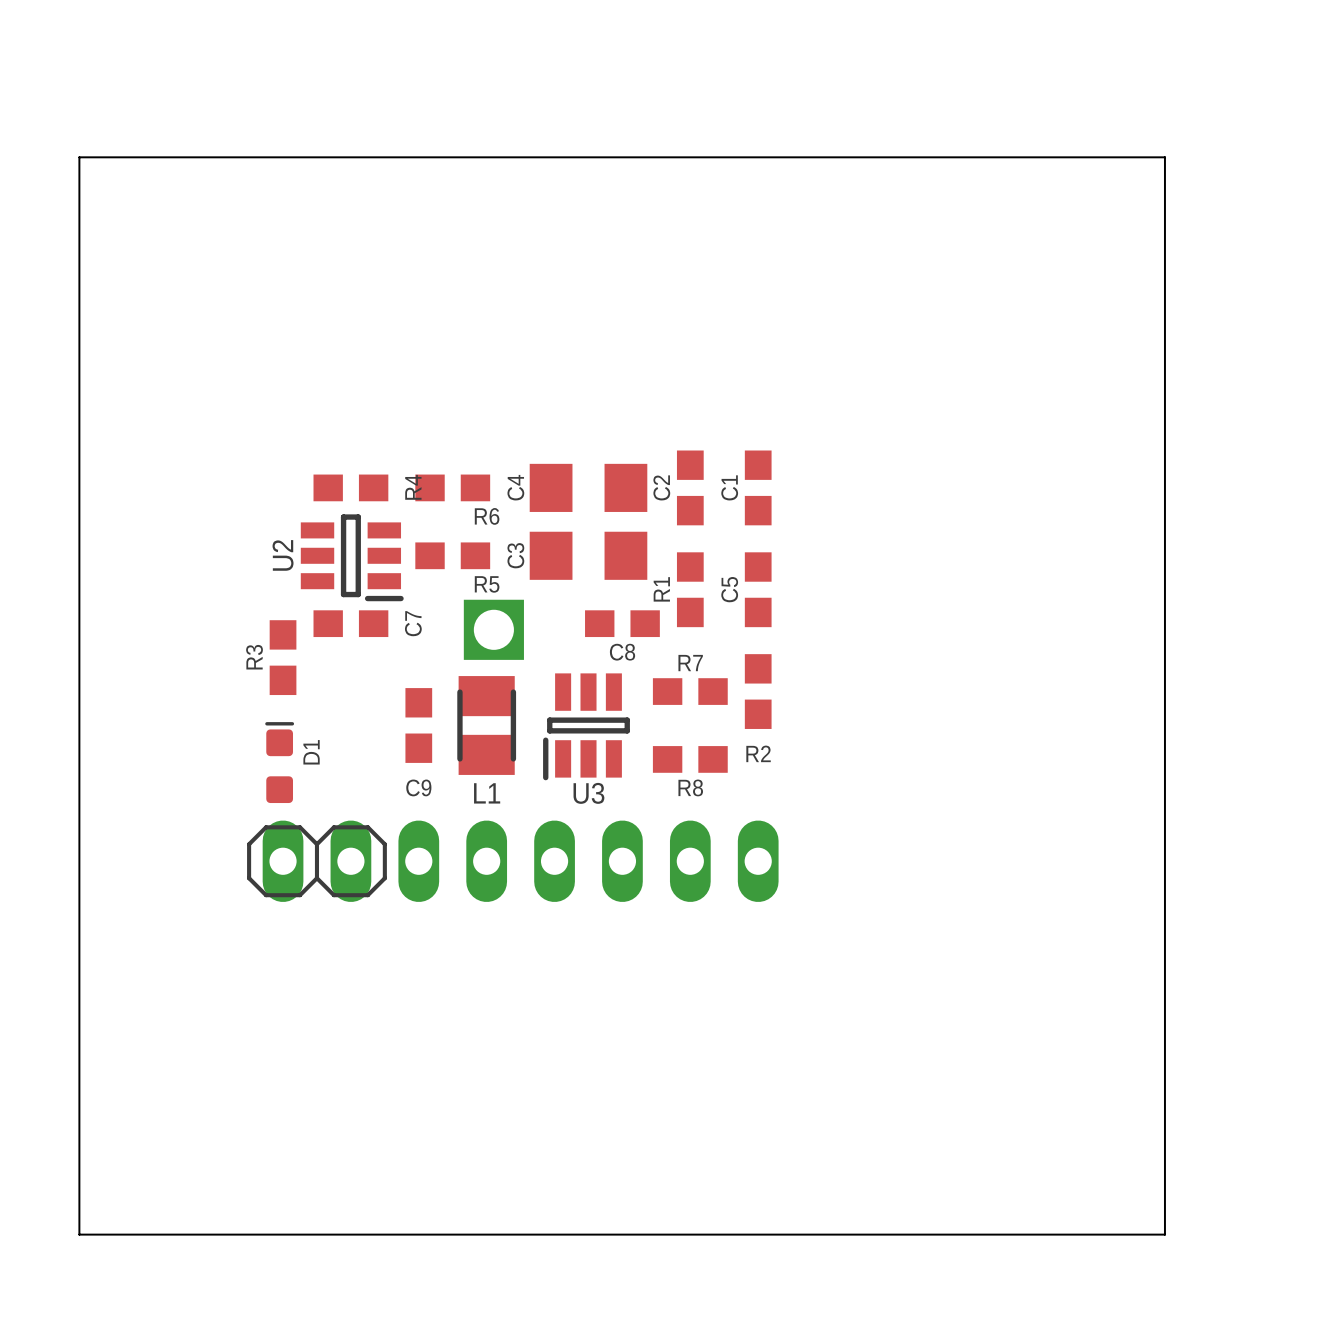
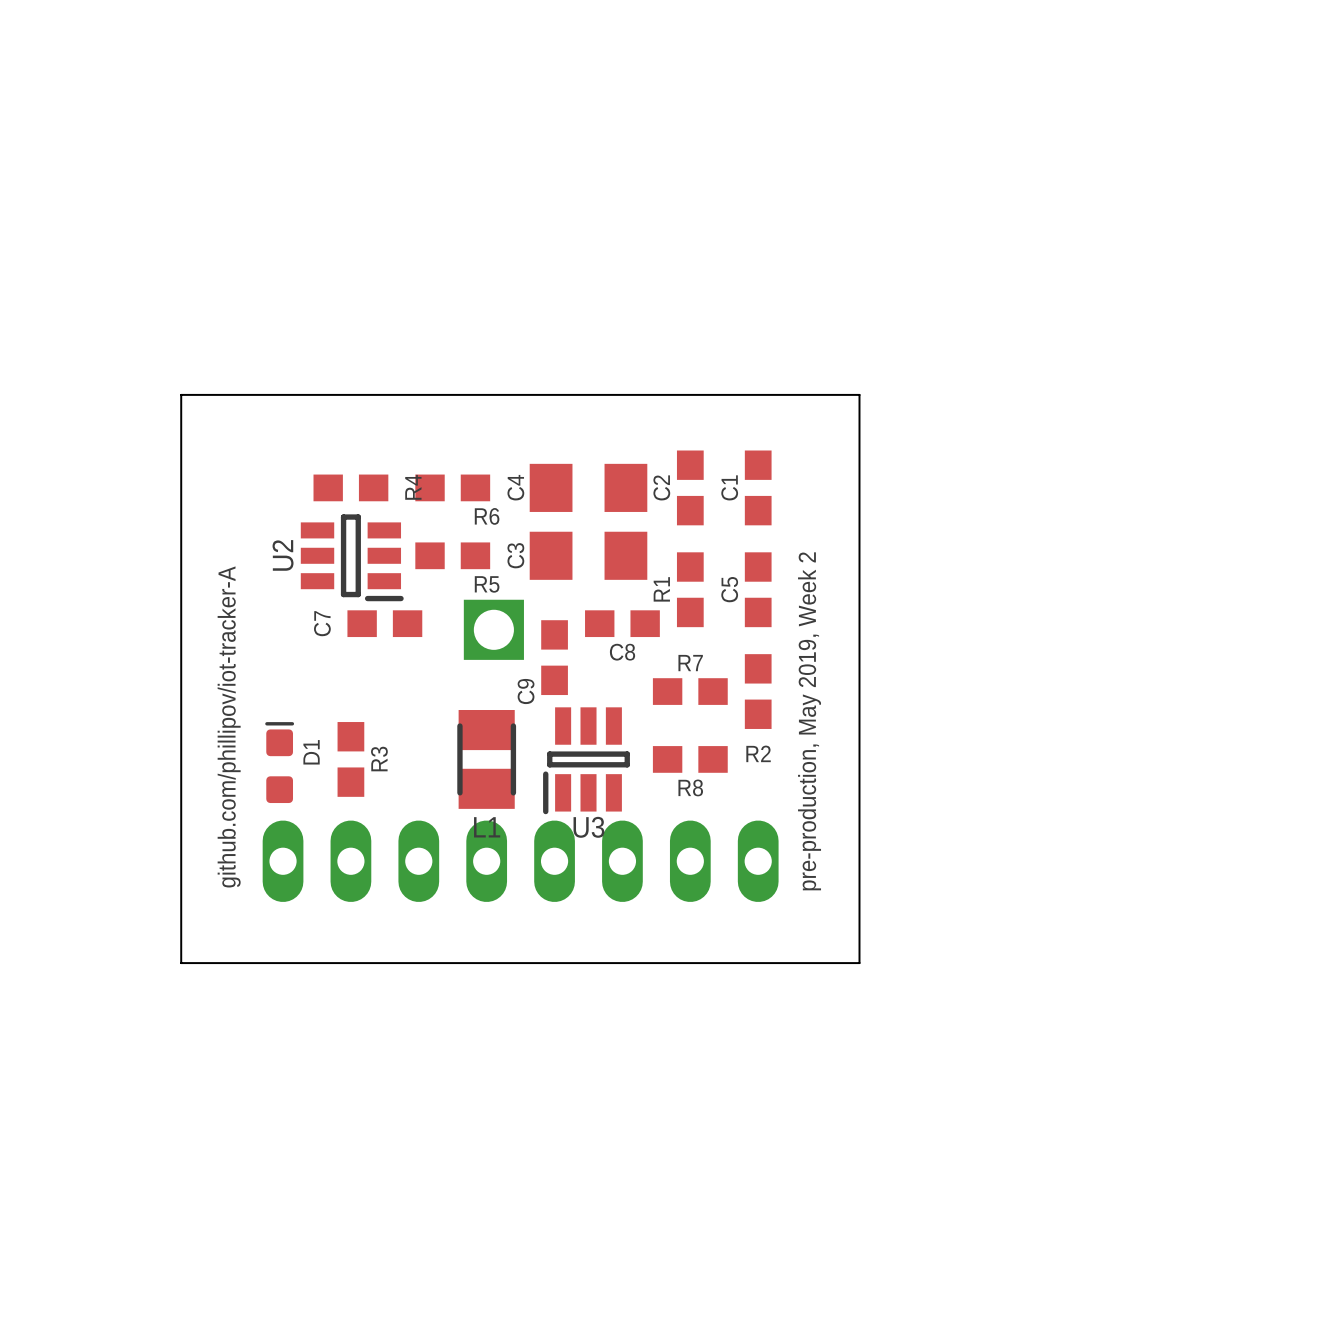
board edge: (79, 157) (1164, 157) (1164, 1234) (79, 1234) (79, 157) -> none
board edge: none -> (181, 394) (859, 394) (859, 963) (181, 963) (181, 394)
C7 position: (350, 623) -> (384, 623)
C7 name position: C7 (413, 623) -> C7 (322, 623)
R3 name position: R3 (254, 657) -> R3 (379, 759)
R3 position: (283, 657) -> (350, 759)
text: none -> pre-production, May 2019, Week 2 (809, 721)
C9 position: (418, 725) -> (554, 657)
L1 position: (486, 725) -> (486, 759)
text: none -> github.com/phillipov/iot-tracker-A (229, 726)
U3 position: (586, 726) -> (586, 760)
C9 name rotation: 0° (418, 787) -> 90° counterclockwise (526, 691)
C9 name position: C9 (418, 787) -> C9 (526, 691)
part side: top (316, 861) -> bottom (316, 861)

